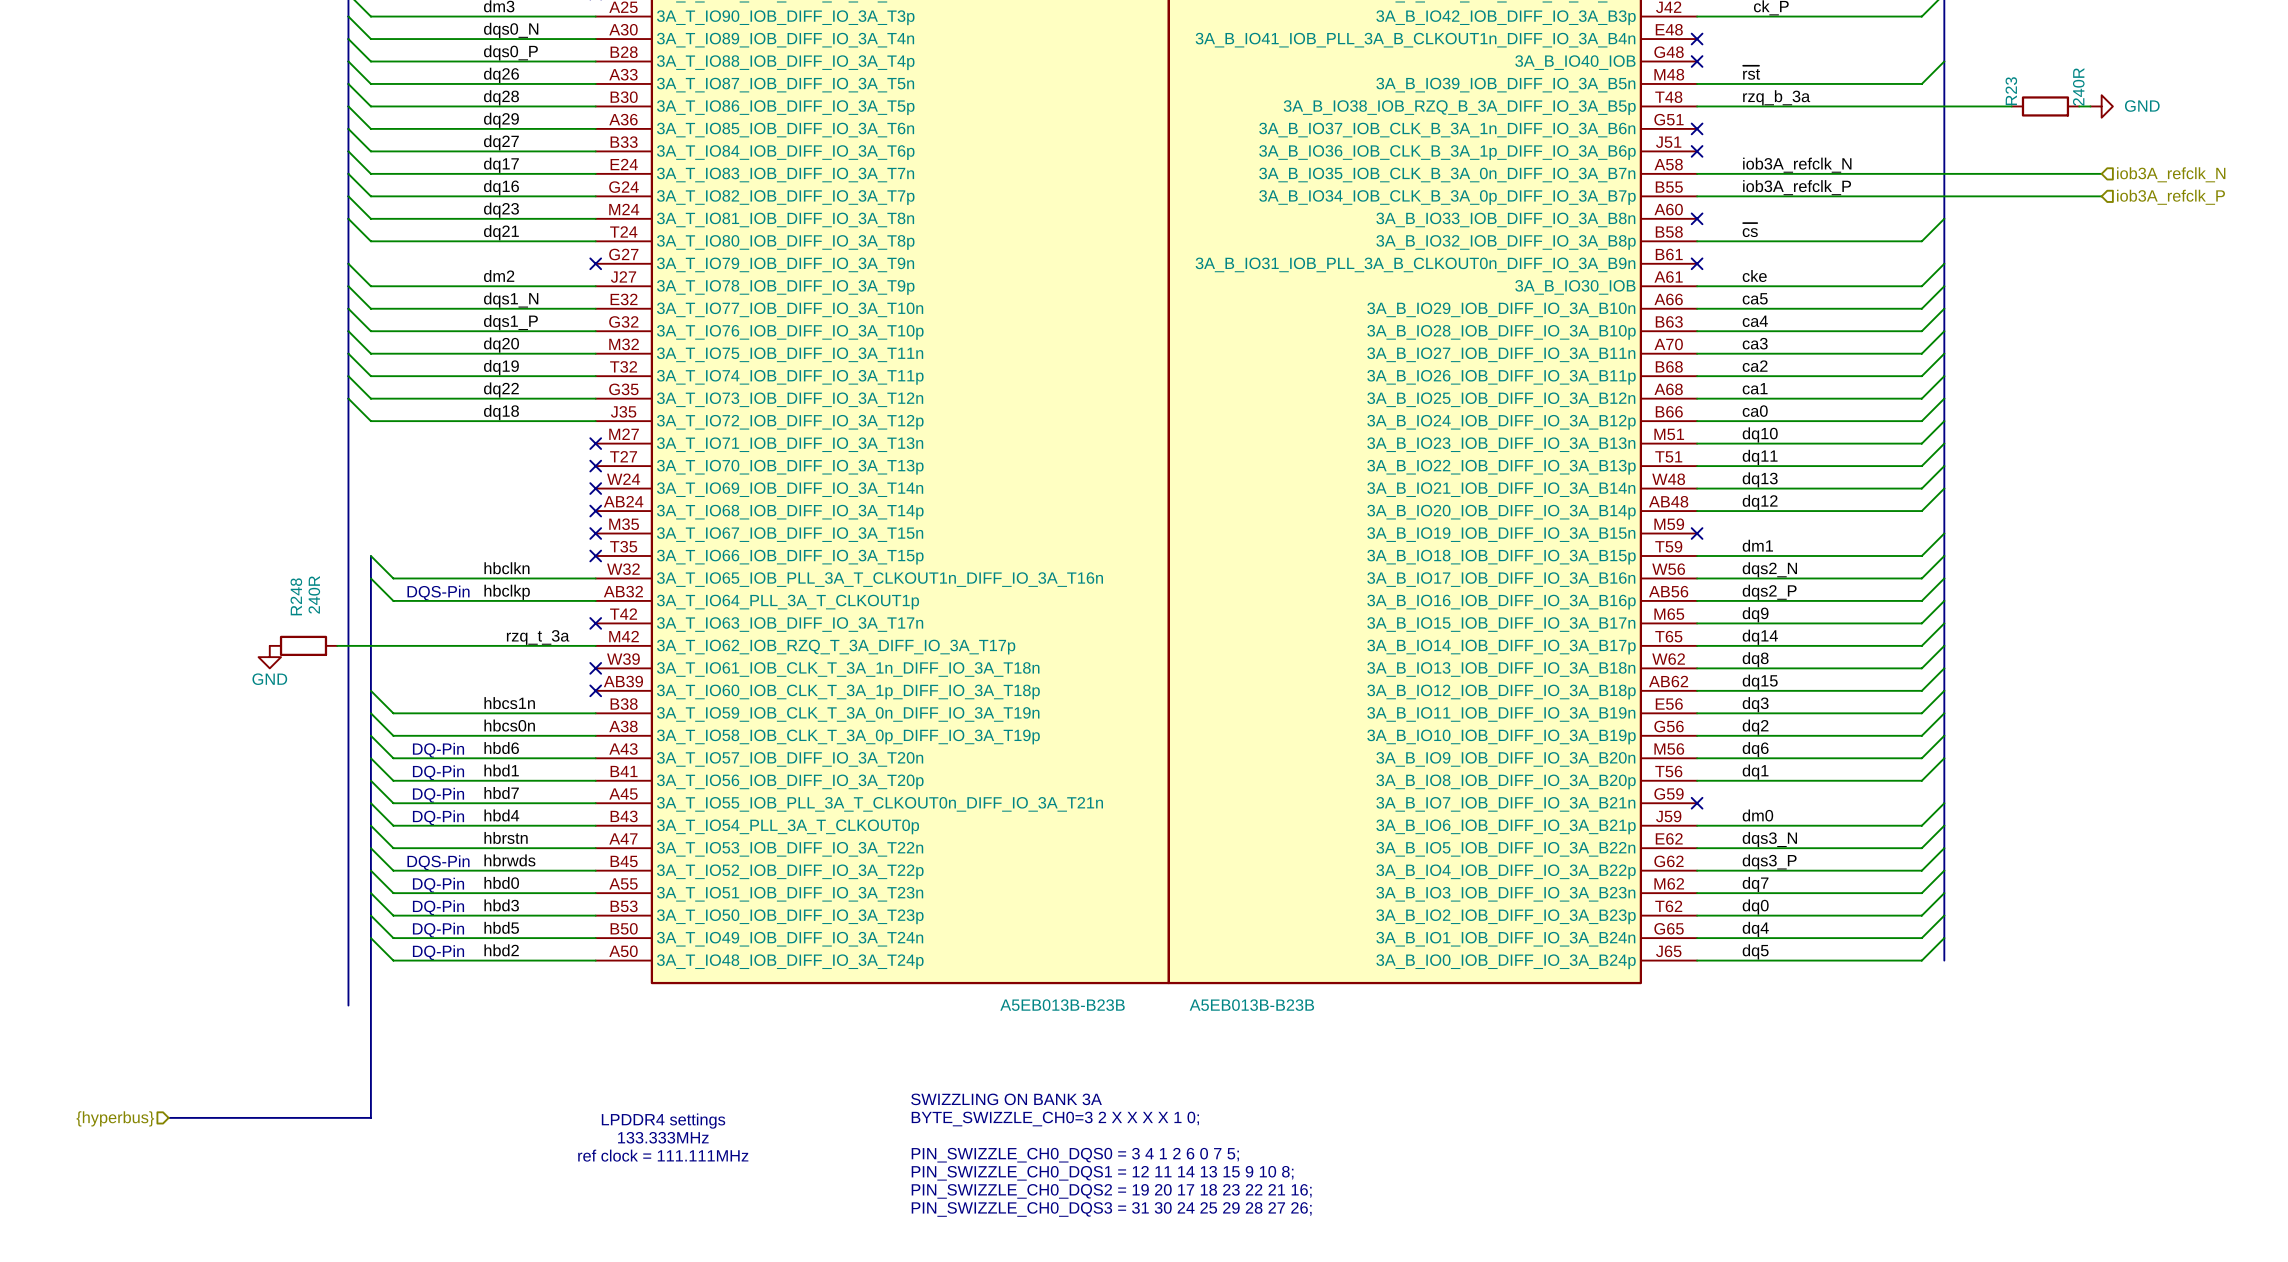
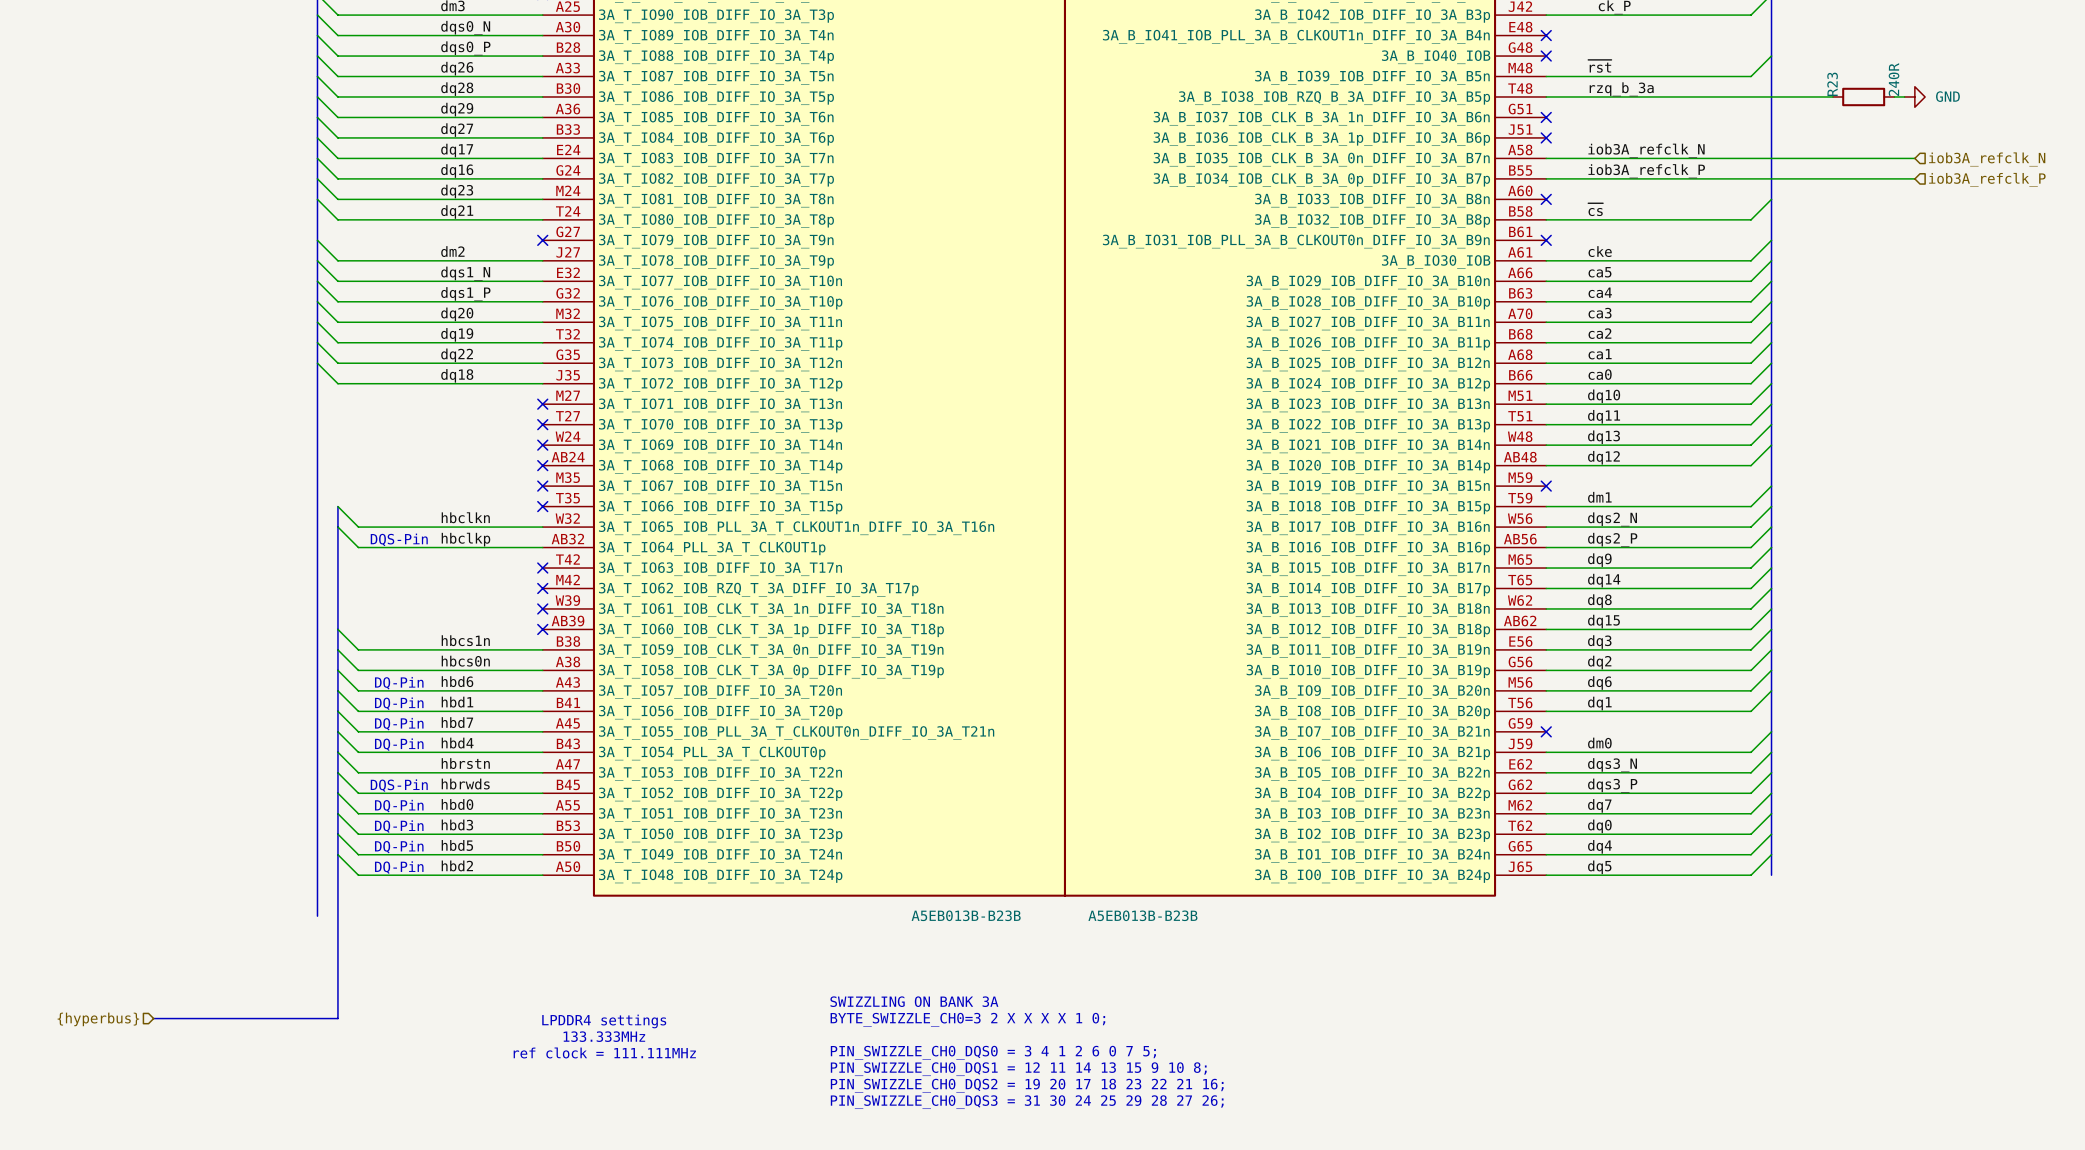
label: rzq_t_3a (538, 637) -> none
R248: 240R (303, 645) -> none
wire: (337, 645) (595, 645) -> none
no-connect mark: none -> (542, 588)
power symbol: GND (269, 657) -> none

